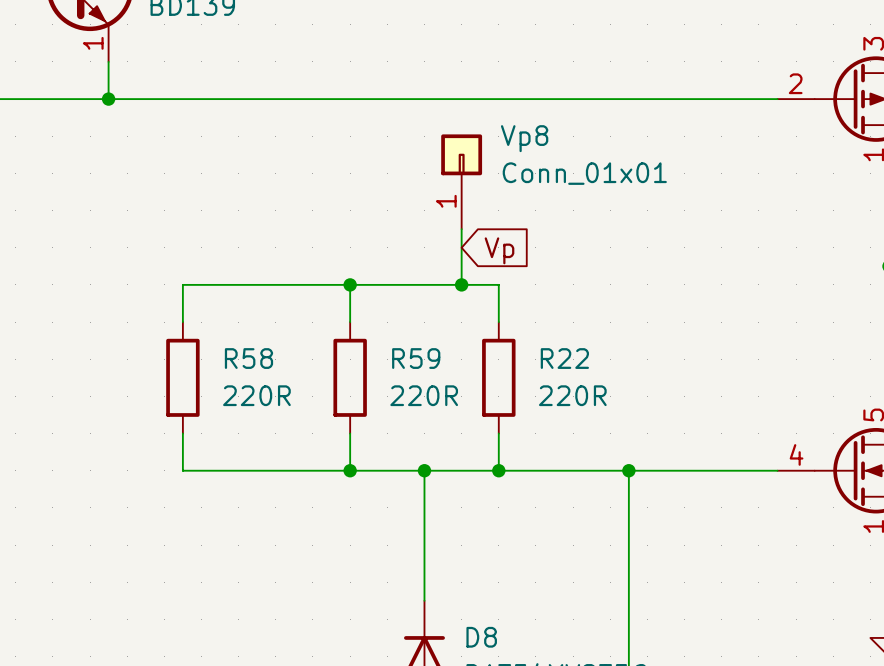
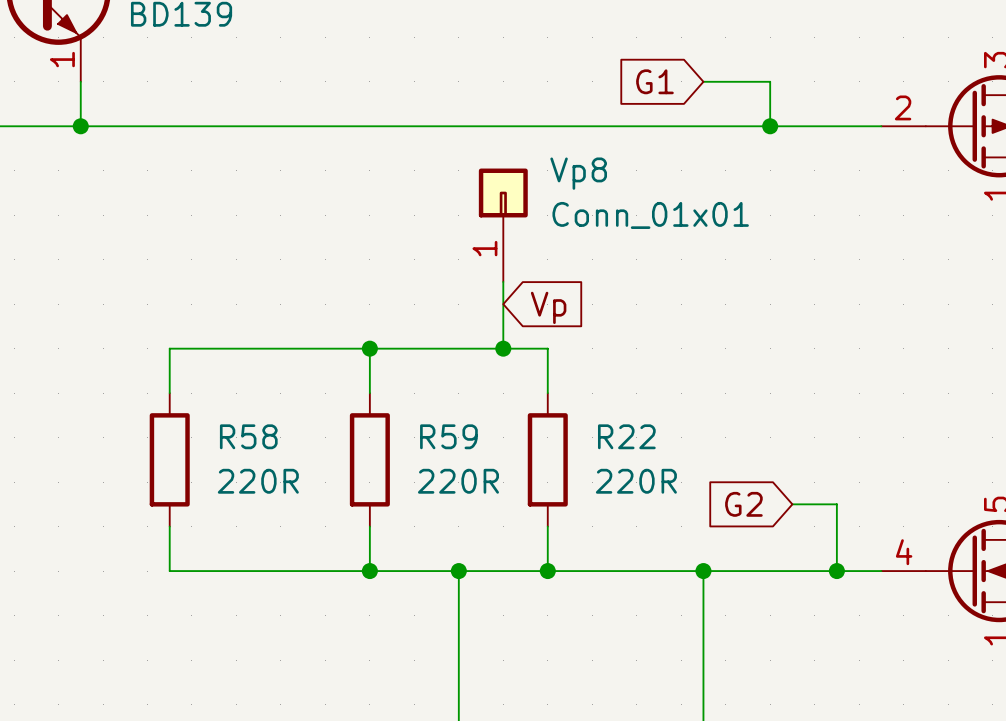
global label: none -> G1 (654, 81)
wire: none -> (703, 81) (770, 81) (770, 126)
junction: none -> (770, 126)
global label: none -> G2 (743, 504)
wire: none -> (792, 504) (836, 504) (836, 571)
junction: none -> (836, 571)

